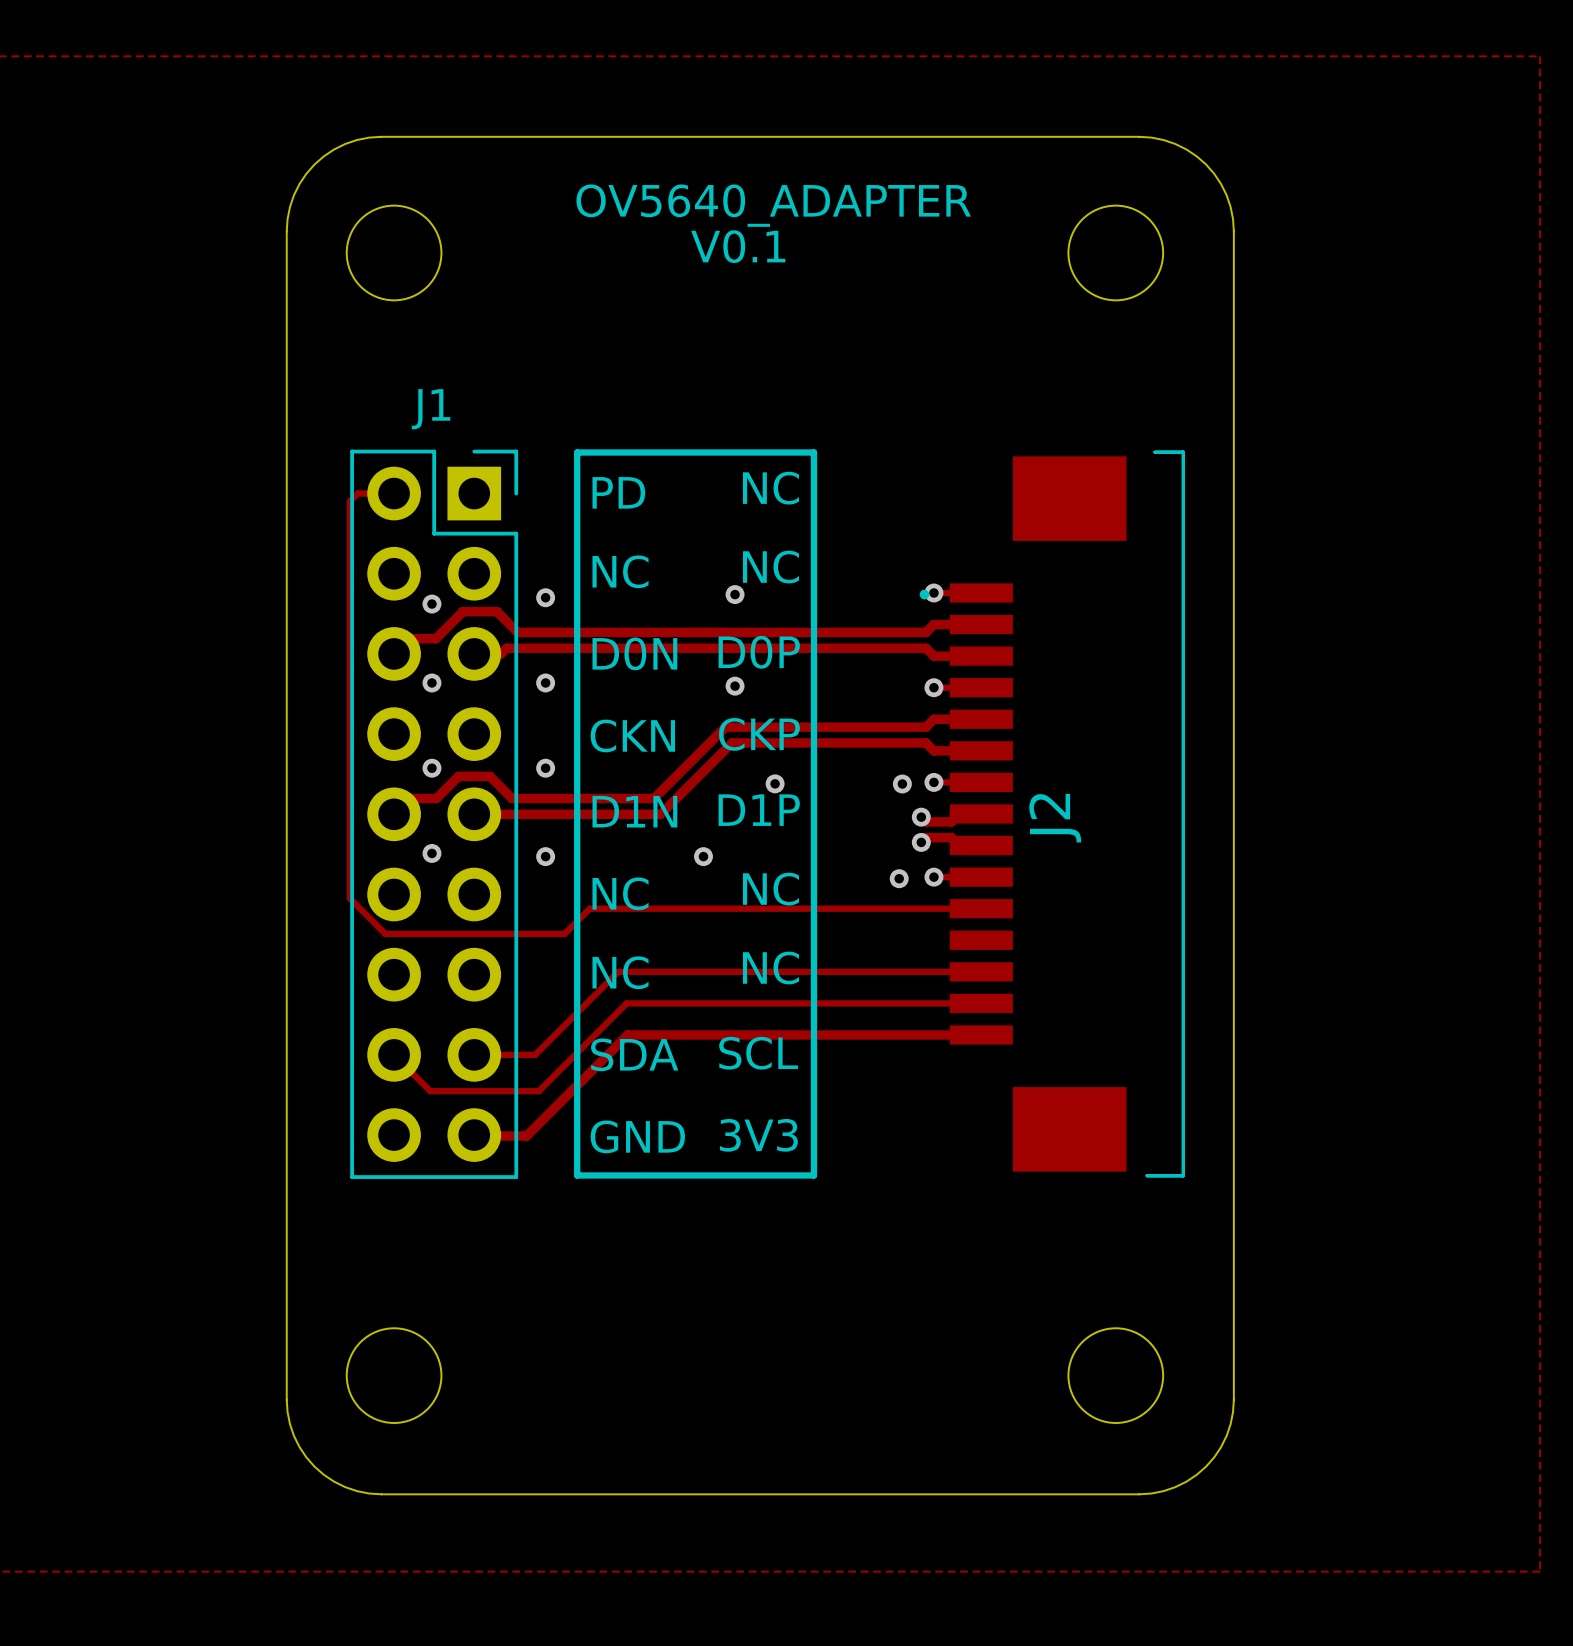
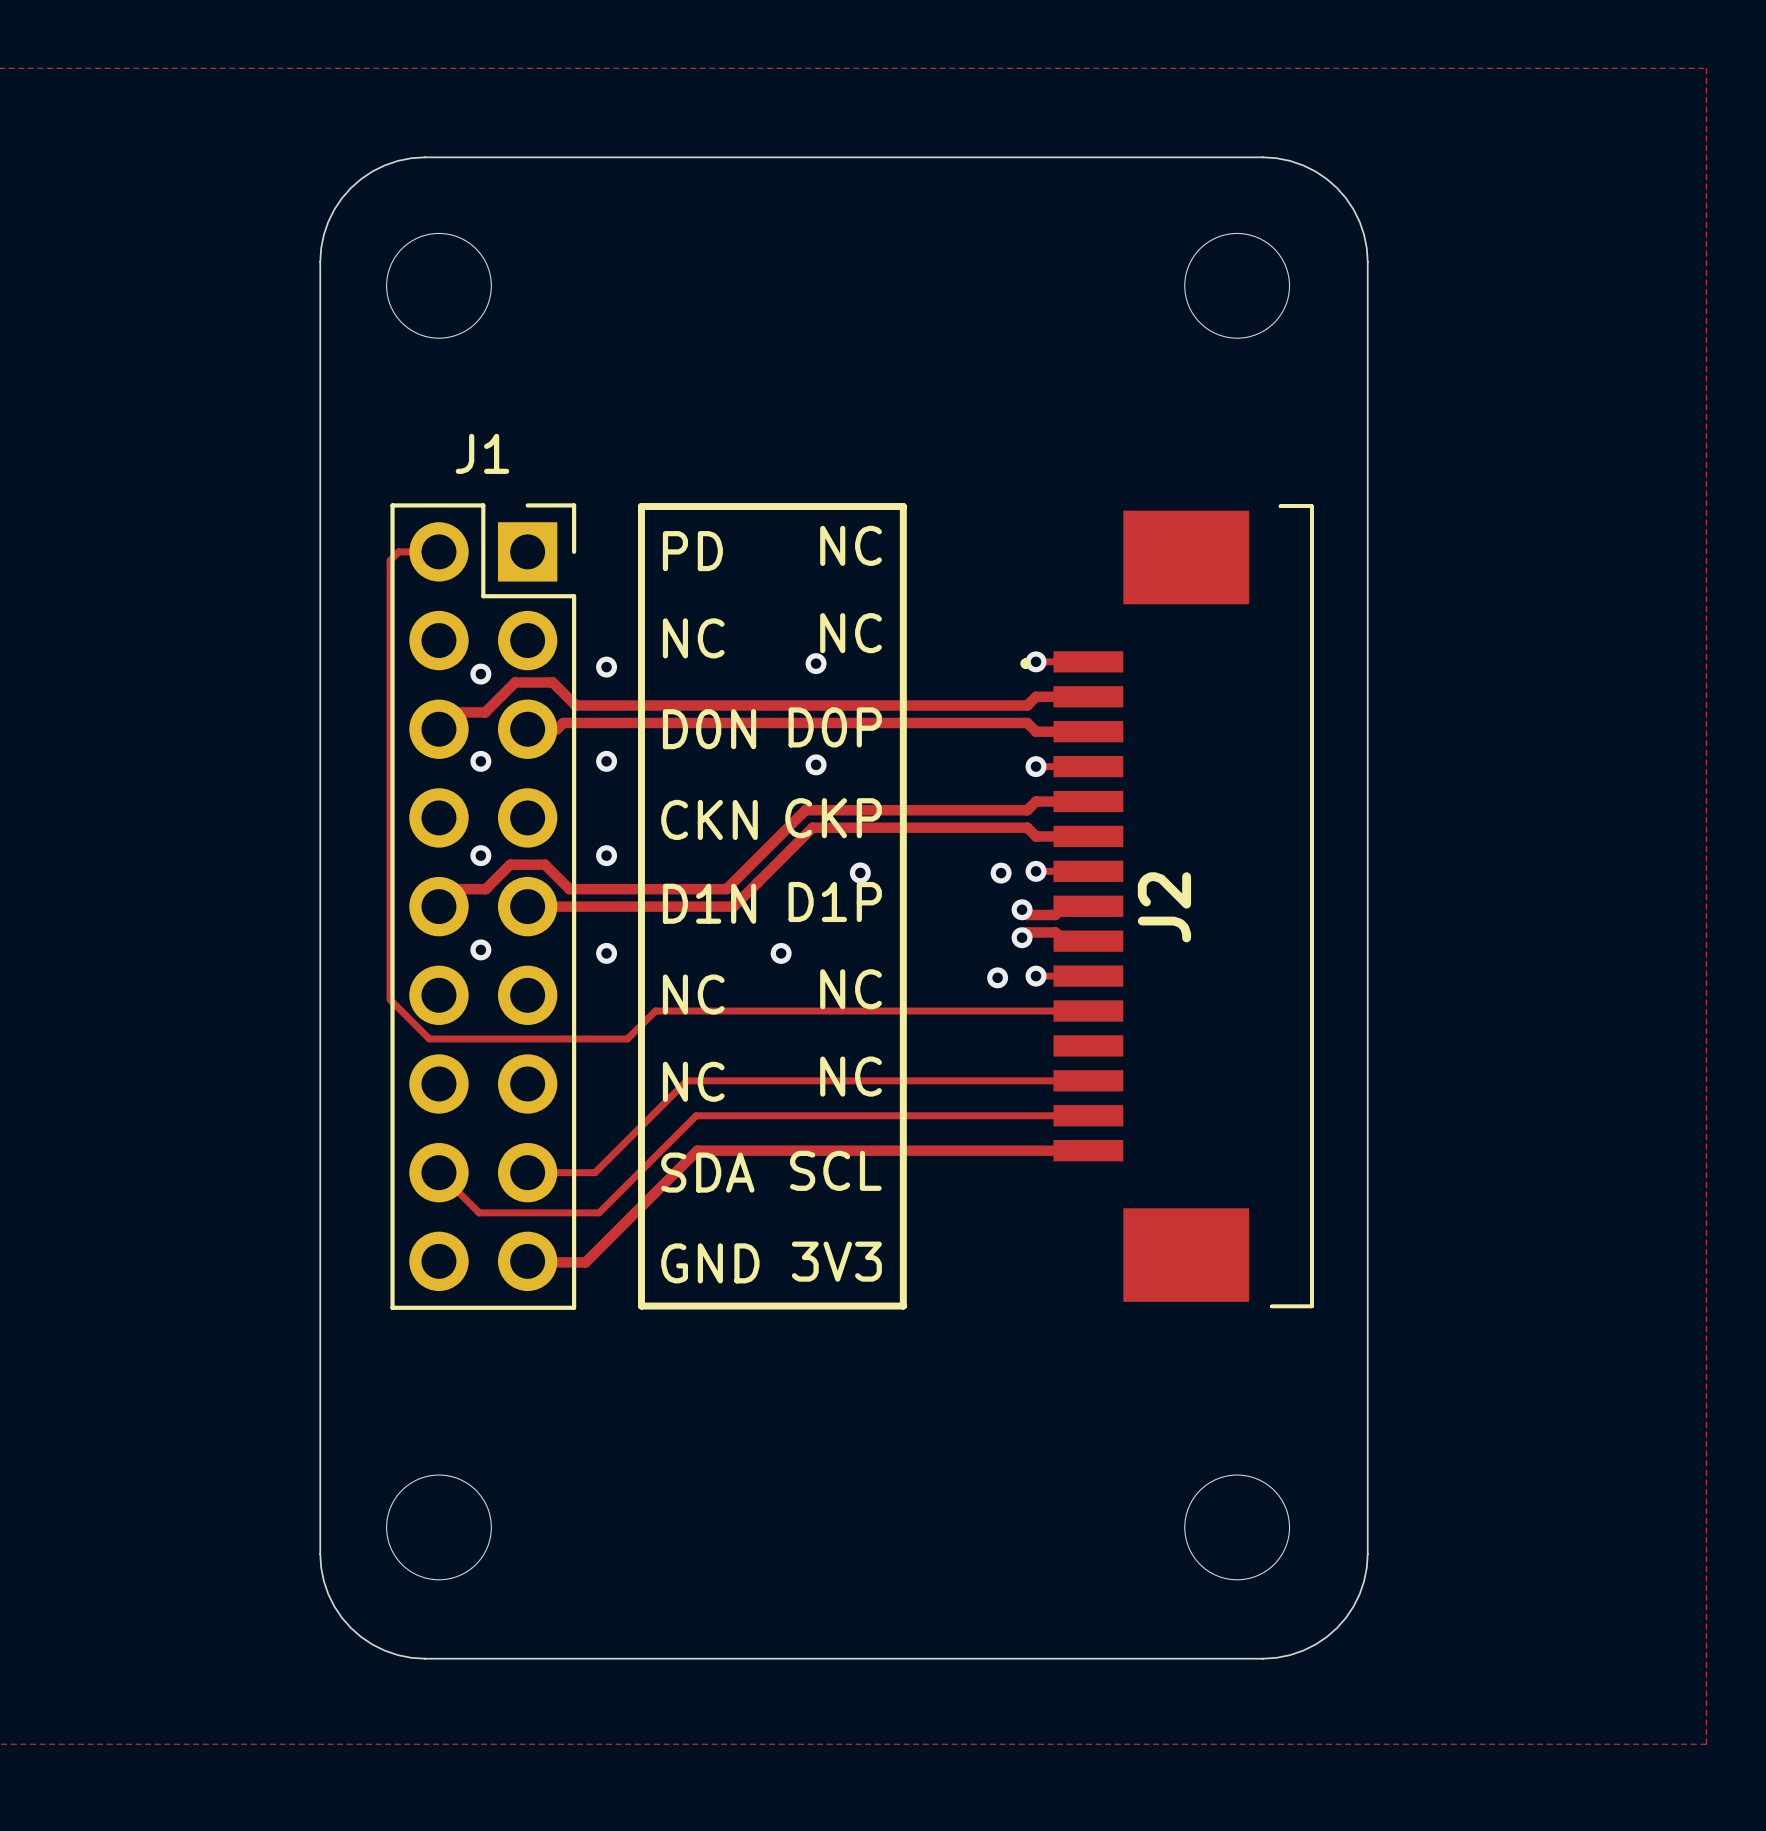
text: OV5640_ADAPTER (773, 205) -> none
text: V0.1 (738, 246) -> none

